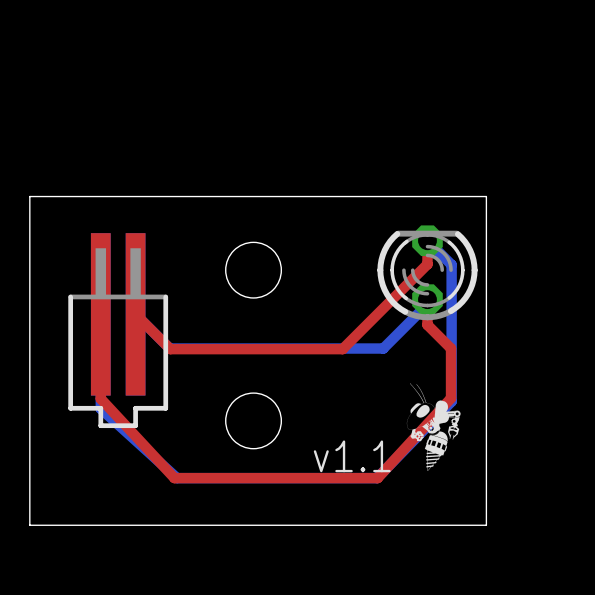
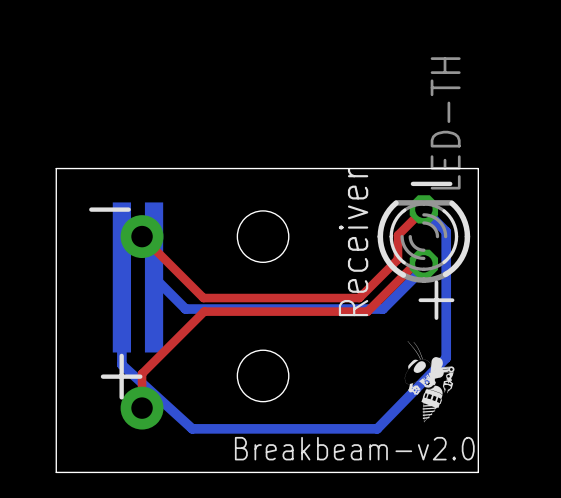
part value: none -> LED-TH (445, 123)
text: none -> _ (431, 183)
text: none -> _ (109, 209)
top track: (427, 240) (427, 264) (342, 349) (170, 349) (135, 314) -> (423, 209) (398, 235) (398, 259) (359, 298) (203, 298) (142, 236)
via: none -> (142, 236)
text: none -> Receiver (353, 242)
top track: (427, 299) (427, 324) (451, 348) (451, 398) (377, 478) (174, 478) (100, 398) (100, 314) -> (423, 263) (415, 263) (367, 311) (204, 311) (142, 373) (142, 408)
part: (118, 330) -> none
text: none -> + (436, 300)
text: none -> + (121, 376)
via: none -> (142, 408)
text: v1.1 (352, 456) -> none
text: none -> Breakbeam-v2.0 (354, 448)

